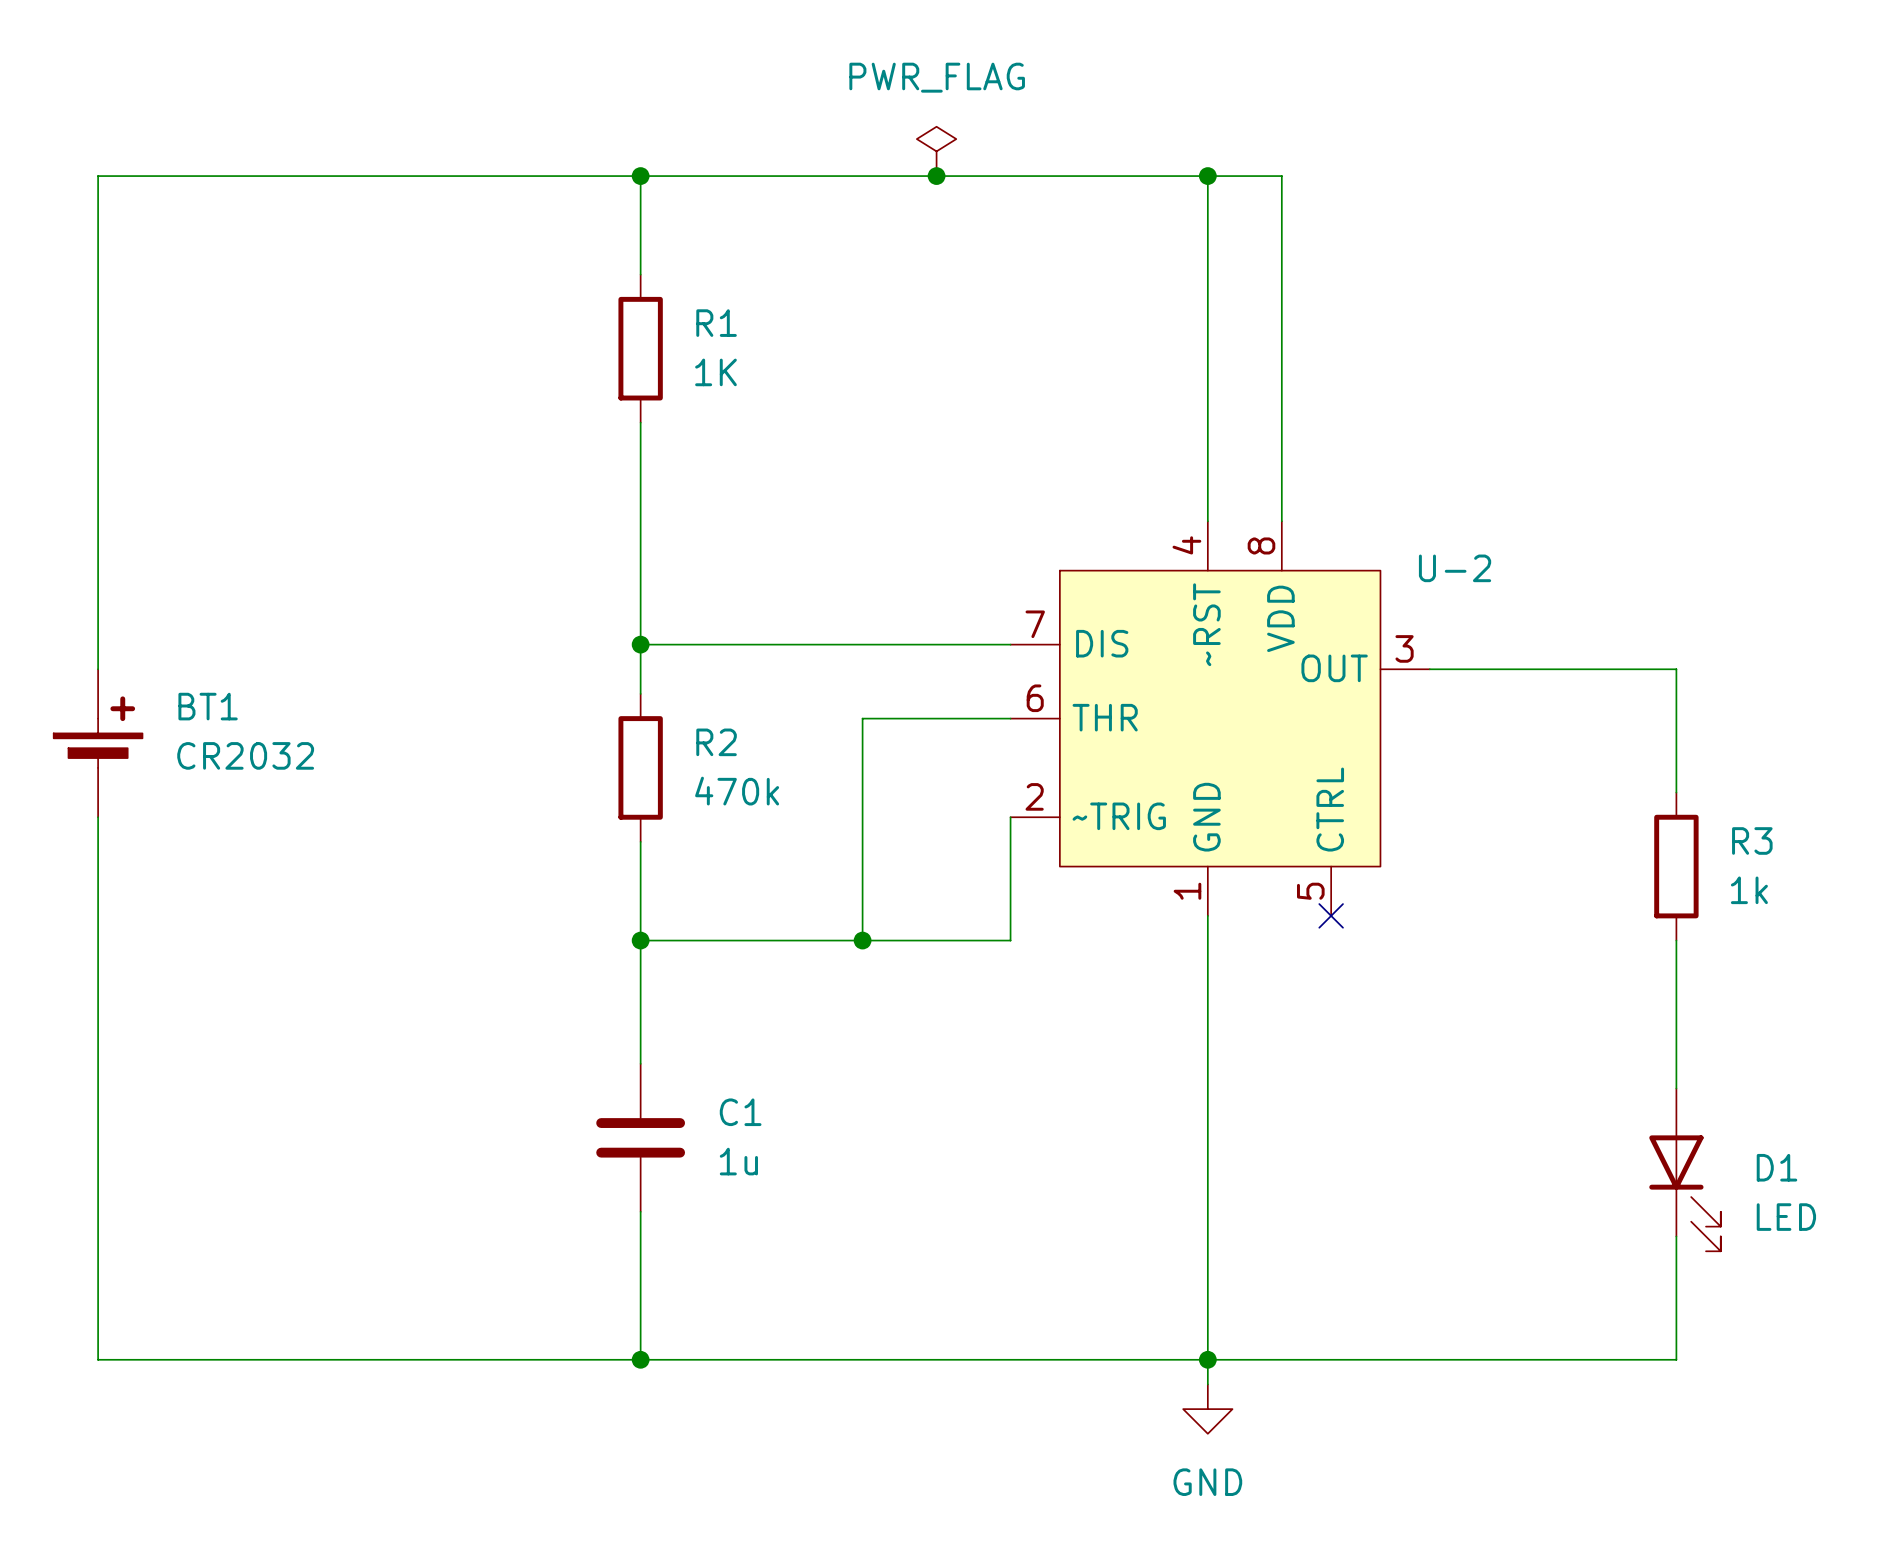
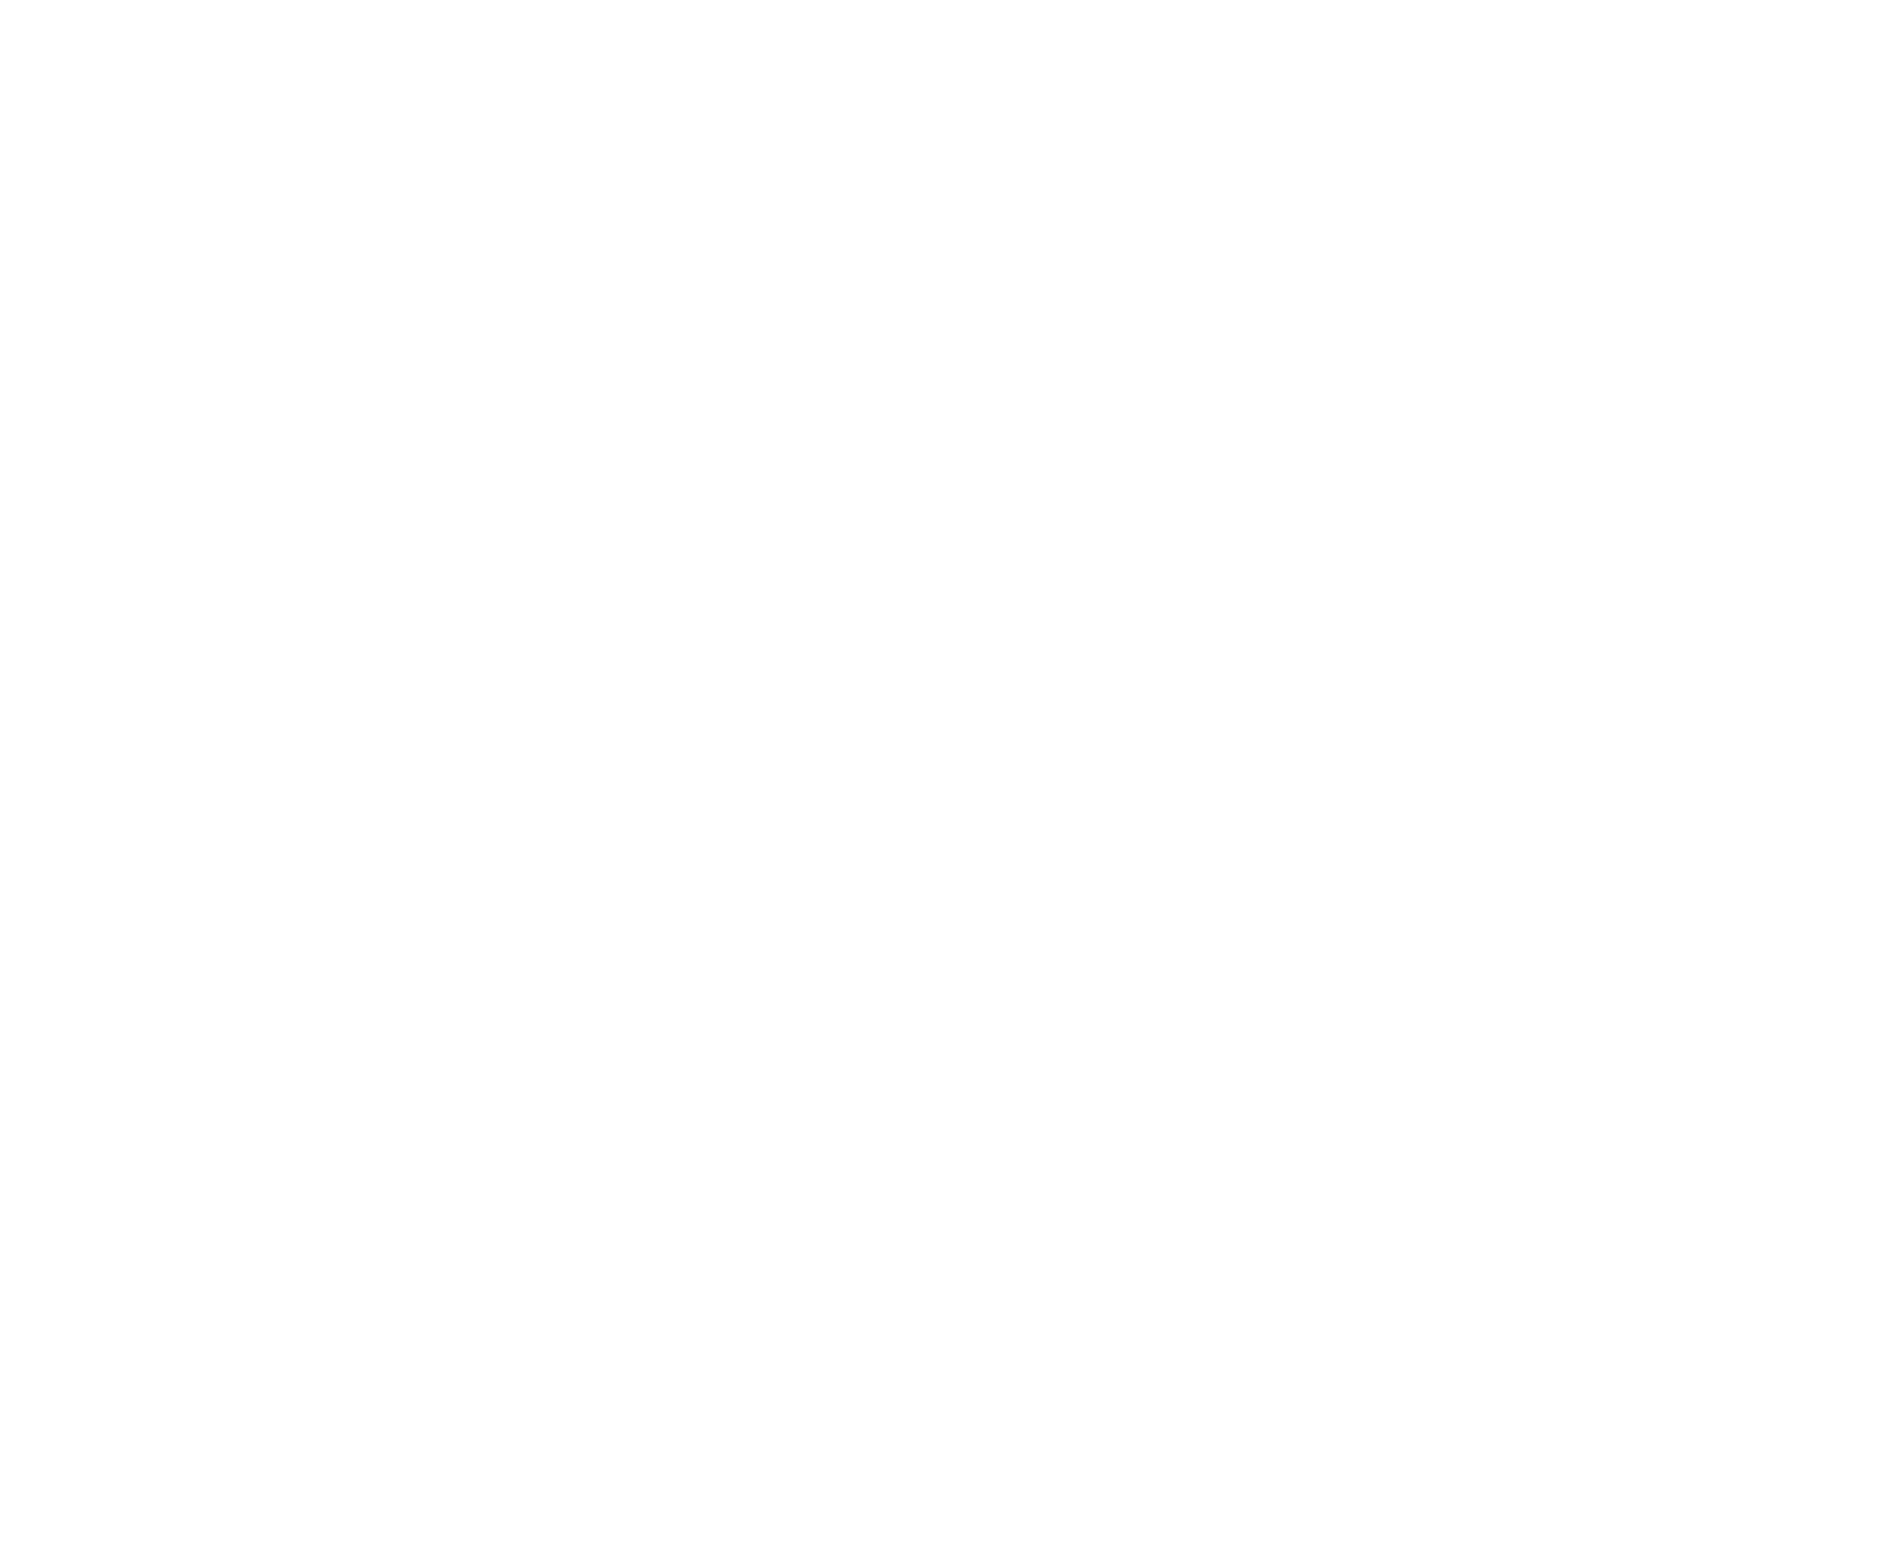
power symbol: PWR_FLAG (936, 151) -> none
wire: (640, 176) (640, 274) -> none
junction: (640, 176) -> none
junction: (936, 176) -> none
wire: (1207, 176) (1207, 521) -> none
junction: (1207, 176) -> none
R1: 1K (640, 348) -> none
wire: (640, 422) (640, 693) -> none
wire: (1281, 521) (1281, 176) (98, 176) (98, 669) -> none
wire: (640, 644) (1010, 644) -> none
junction: (640, 644) -> none
wire: (1429, 669) (1676, 669) (1676, 792) -> none
wire: (1010, 718) (862, 718) (862, 940) -> none
U-2: (1220, 718) -> none
BT1: CR2032 (98, 743) -> none
R2: 470k (640, 767) -> none
wire: (98, 817) (98, 1359) (1676, 1359) (1676, 1236) -> none
wire: (1010, 817) (1010, 940) (640, 940) -> none
wire: (640, 841) (640, 1063) -> none
R3: 1k (1676, 866) -> none
wire: (1207, 915) (1207, 1384) -> none
no-connect mark: (1331, 915) -> none
junction: (640, 940) -> none
junction: (862, 940) -> none
wire: (1676, 940) (1676, 1088) -> none
C1: 1u (640, 1137) -> none
D1: LED (1685, 1169) -> none
wire: (640, 1211) (640, 1359) -> none
junction: (640, 1359) -> none
junction: (1207, 1359) -> none
power symbol: GND (1207, 1409) -> none

